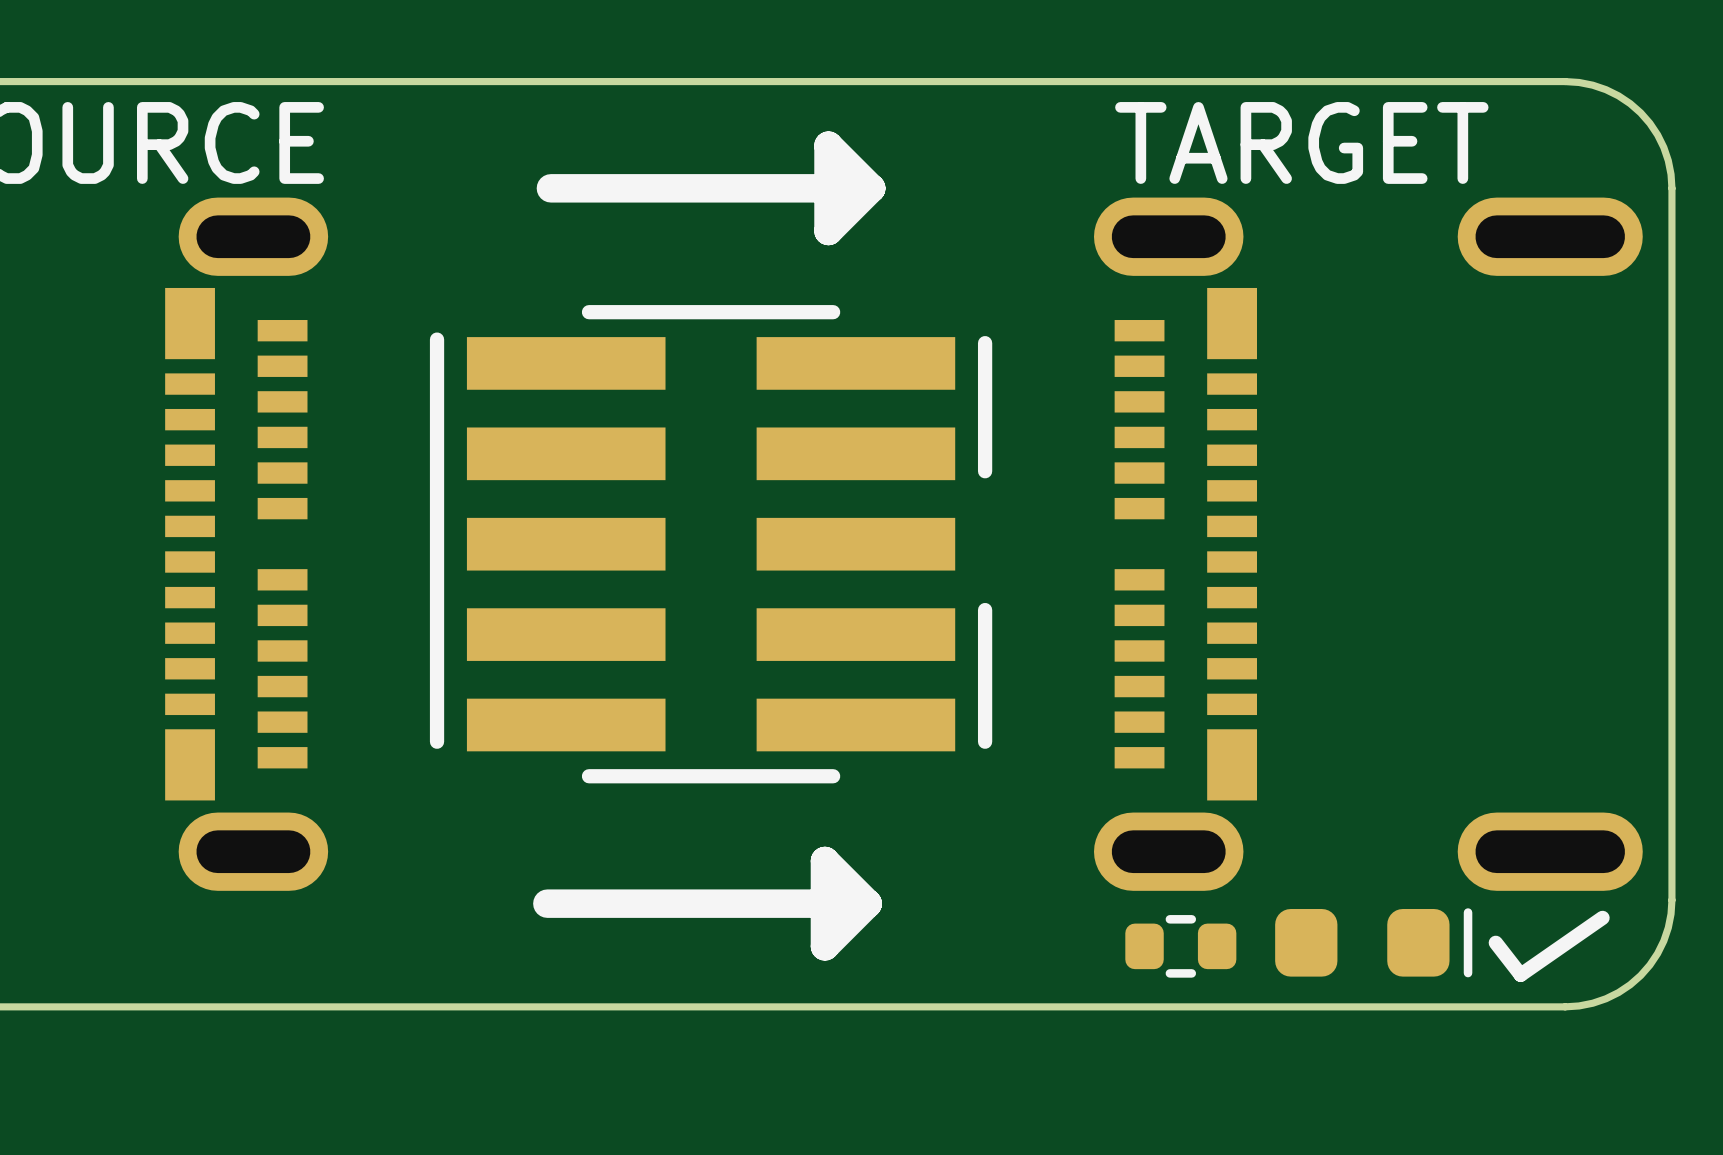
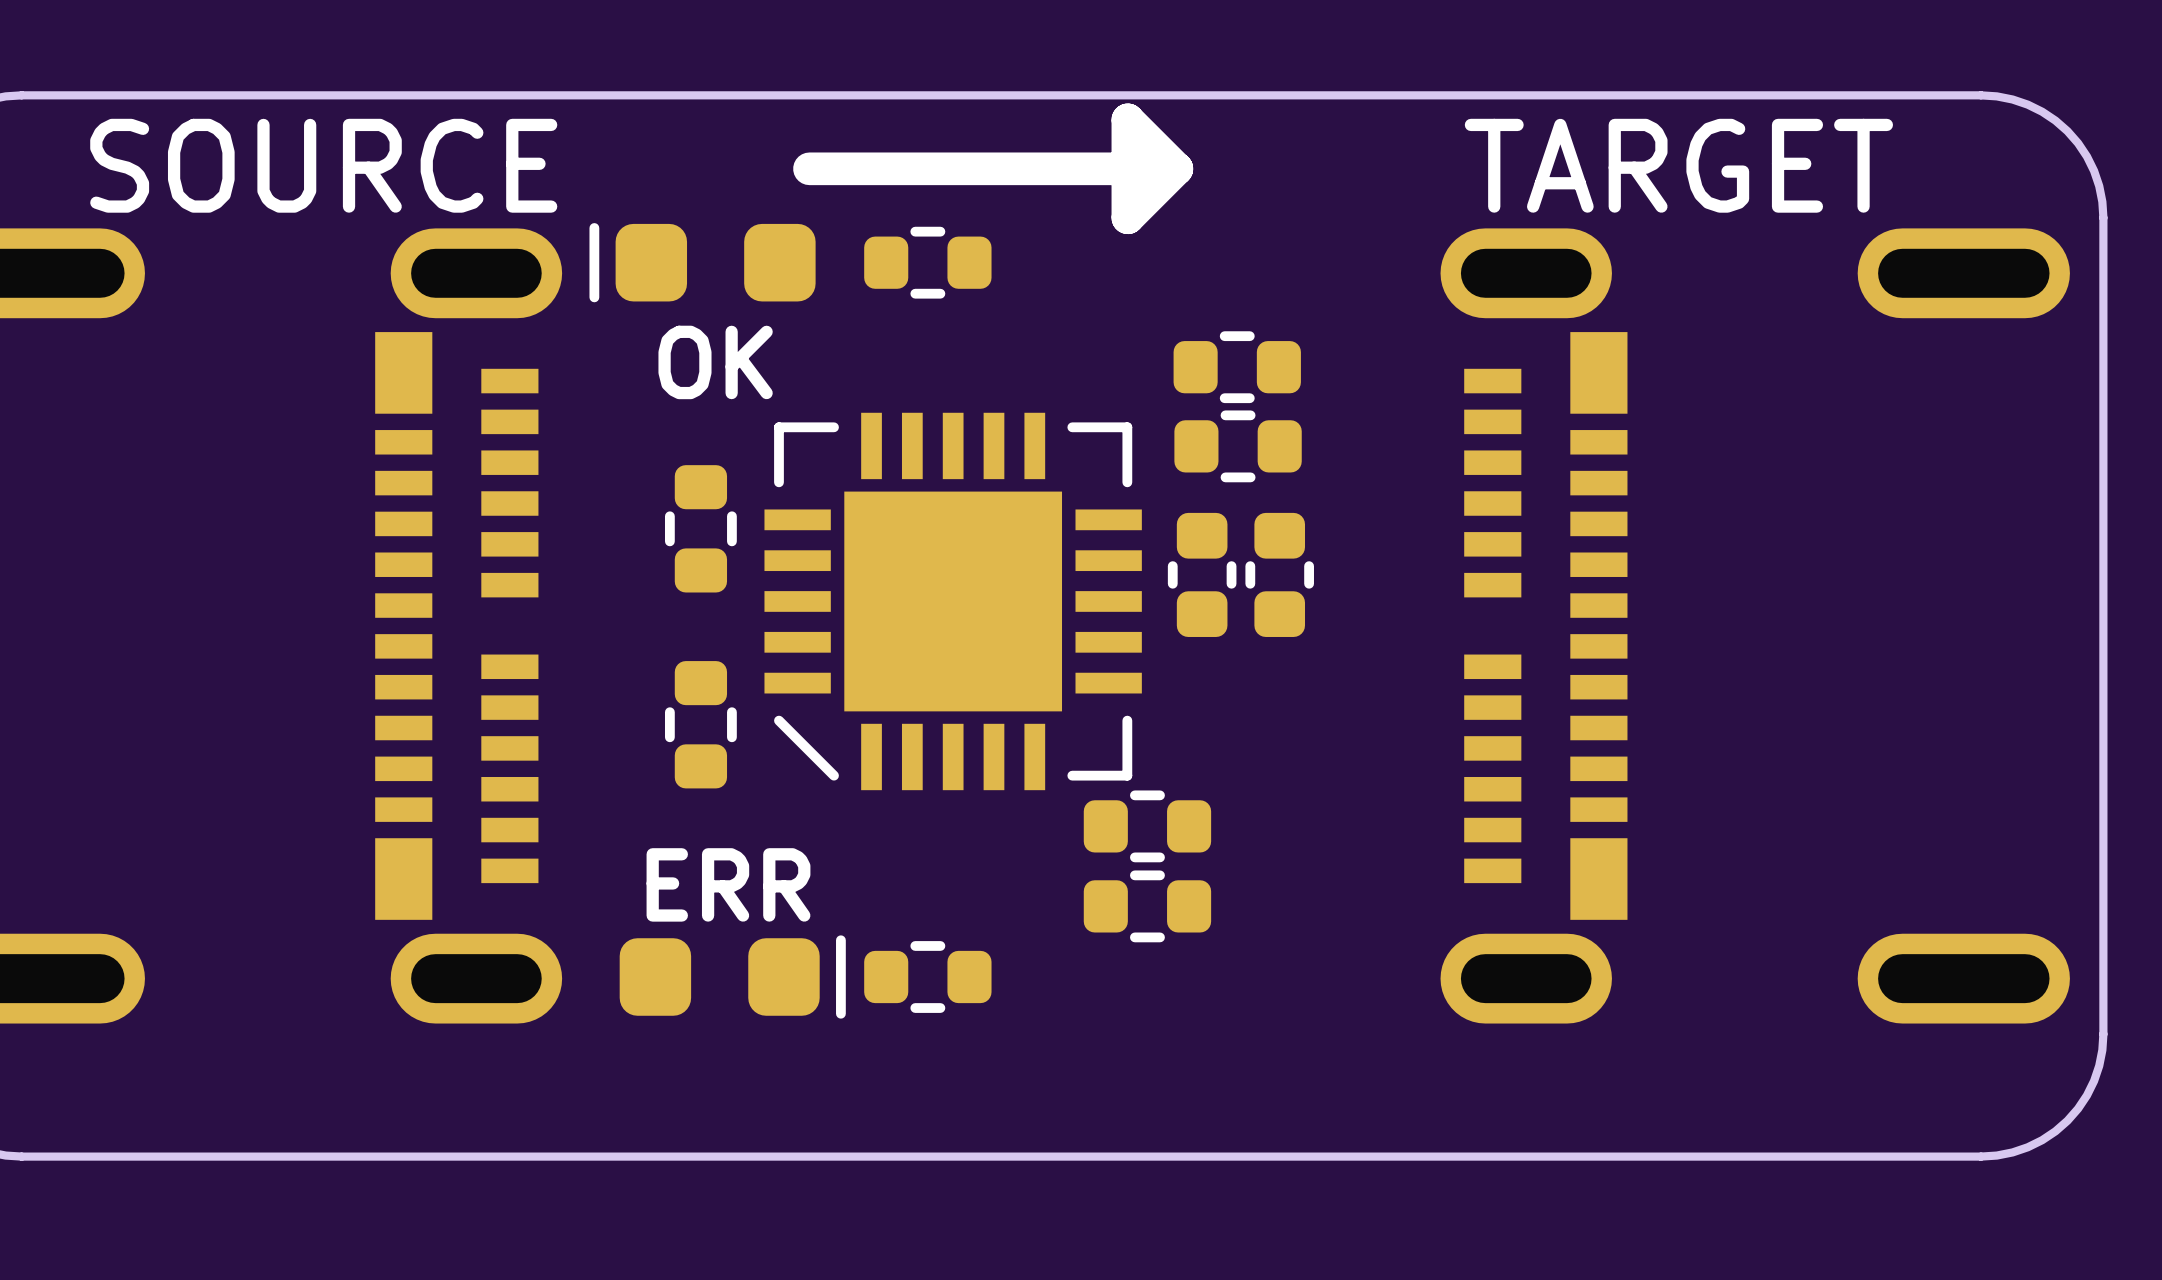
line: (550, 188) (871, 188) -> (809, 168) (1176, 168)
line: (871, 188) (828, 231) (828, 145) (871, 188) -> (1176, 168) (1127, 217) (1127, 119) (1176, 168)
part: none -> (927, 262)
part footprint: [466, 305, 956, 784] -> [764, 412, 1142, 791]
text: none -> OK (715, 362)
part: none -> (1237, 367)
line: (437, 339) (437, 741) -> none
line: (985, 343) (985, 471) -> none
part: none -> (1238, 446)
part: none -> (700, 528)
part: none -> (1202, 574)
part: none -> (1279, 574)
line: (985, 610) (985, 741) -> none
part: none -> (700, 724)
part: none -> (1147, 826)
text: none -> ERR (728, 884)
part: none -> (1147, 906)
part: none -> (732, 976)
part: none -> (927, 976)
line: (547, 903) (867, 903) -> none
line: (867, 903) (824, 946) (824, 860) (867, 903) -> none
line: (1602, 917) (1520, 974) (1495, 942) -> none
part rotation: 0° (1373, 942) -> 180° (702, 262)
part position: (1373, 942) -> (702, 262)
part: (1180, 946) -> none

